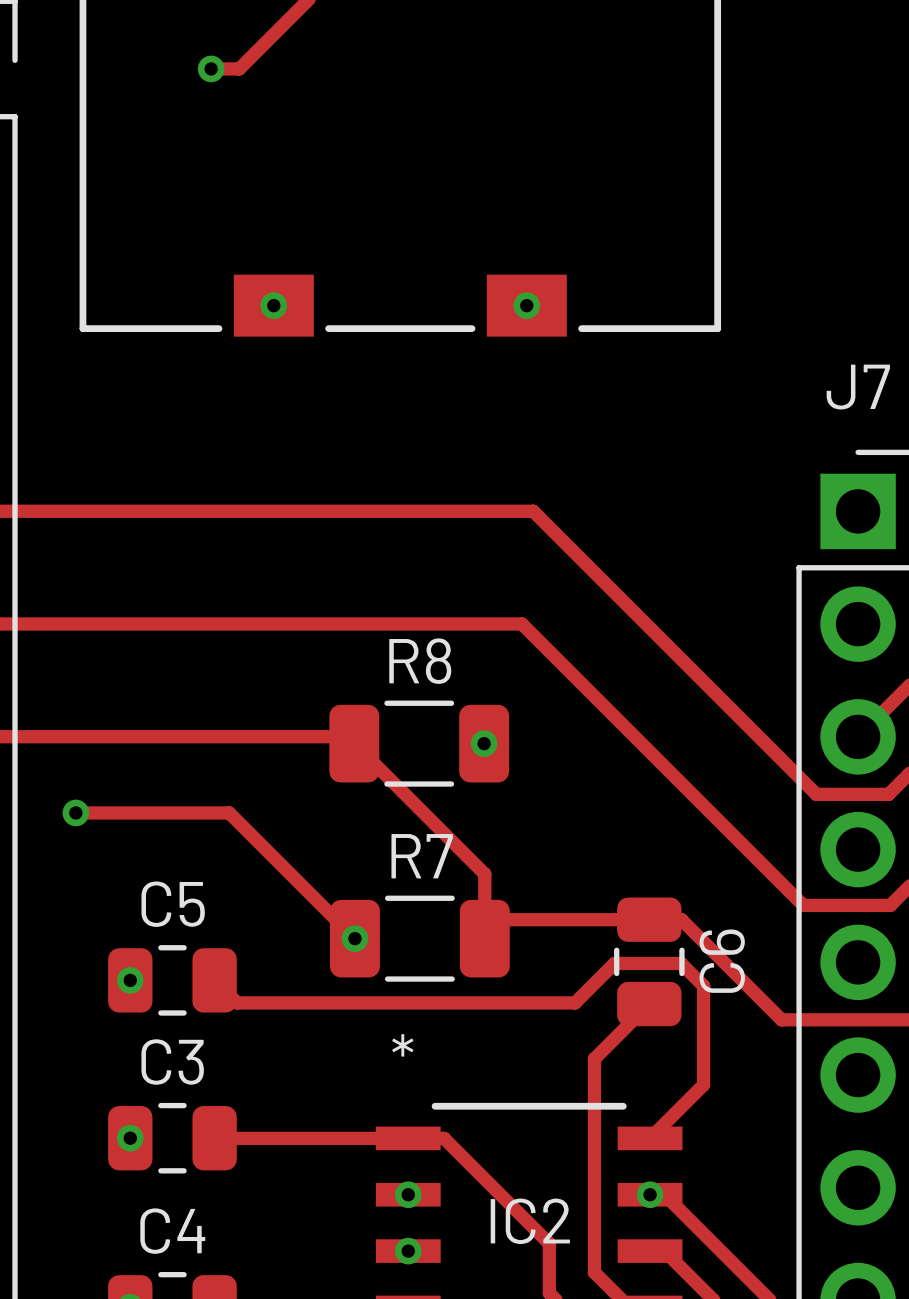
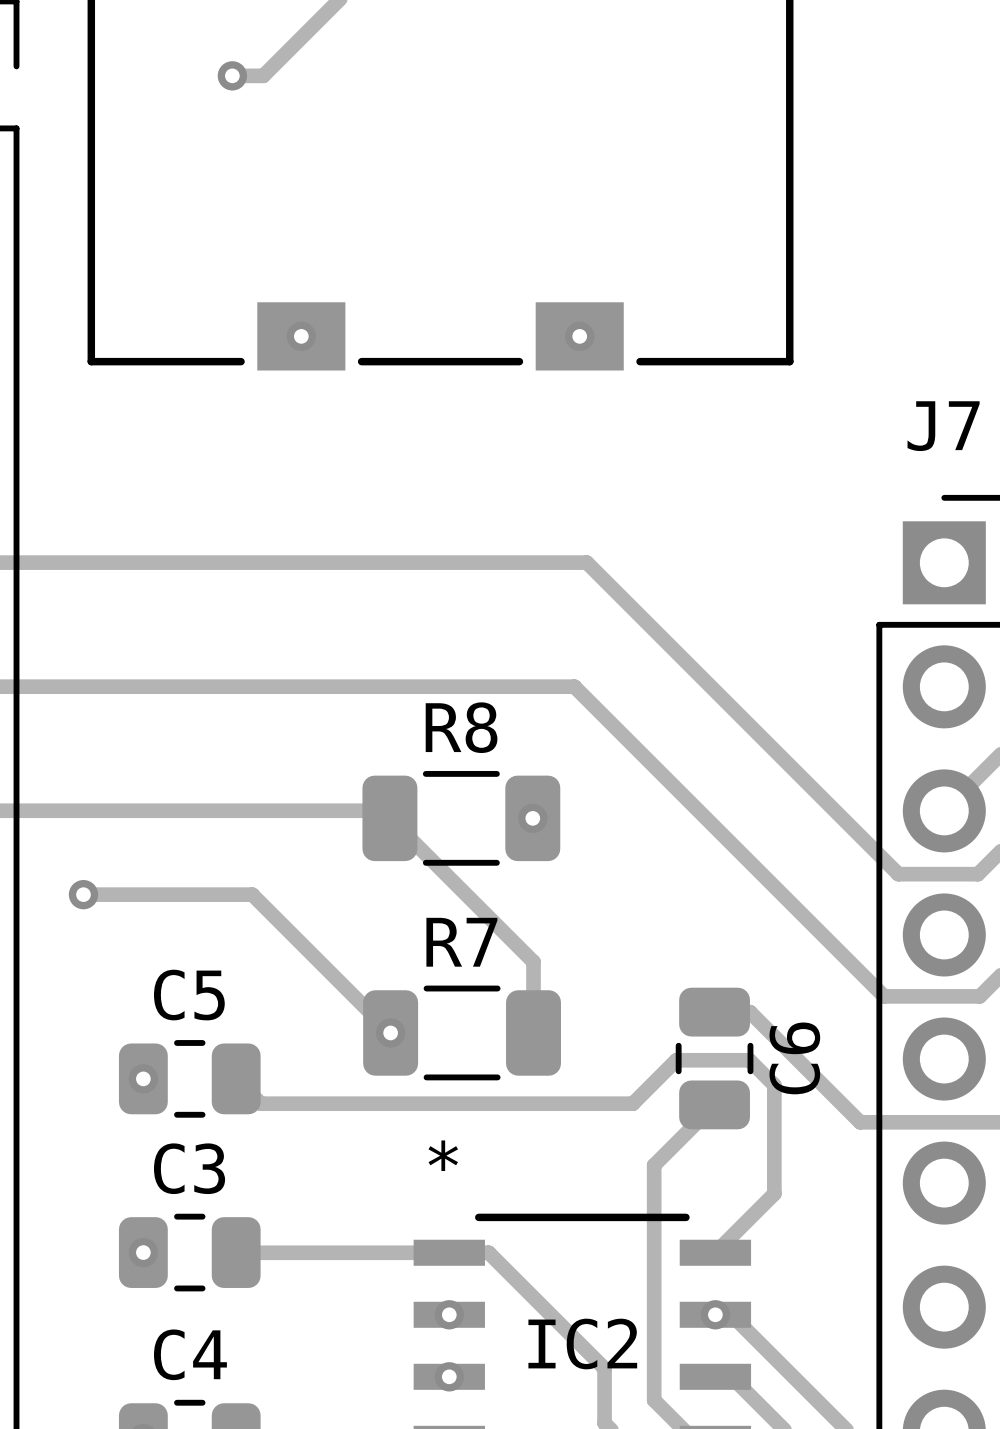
track: (649, 919) (503, 919) (484, 938) -> none

